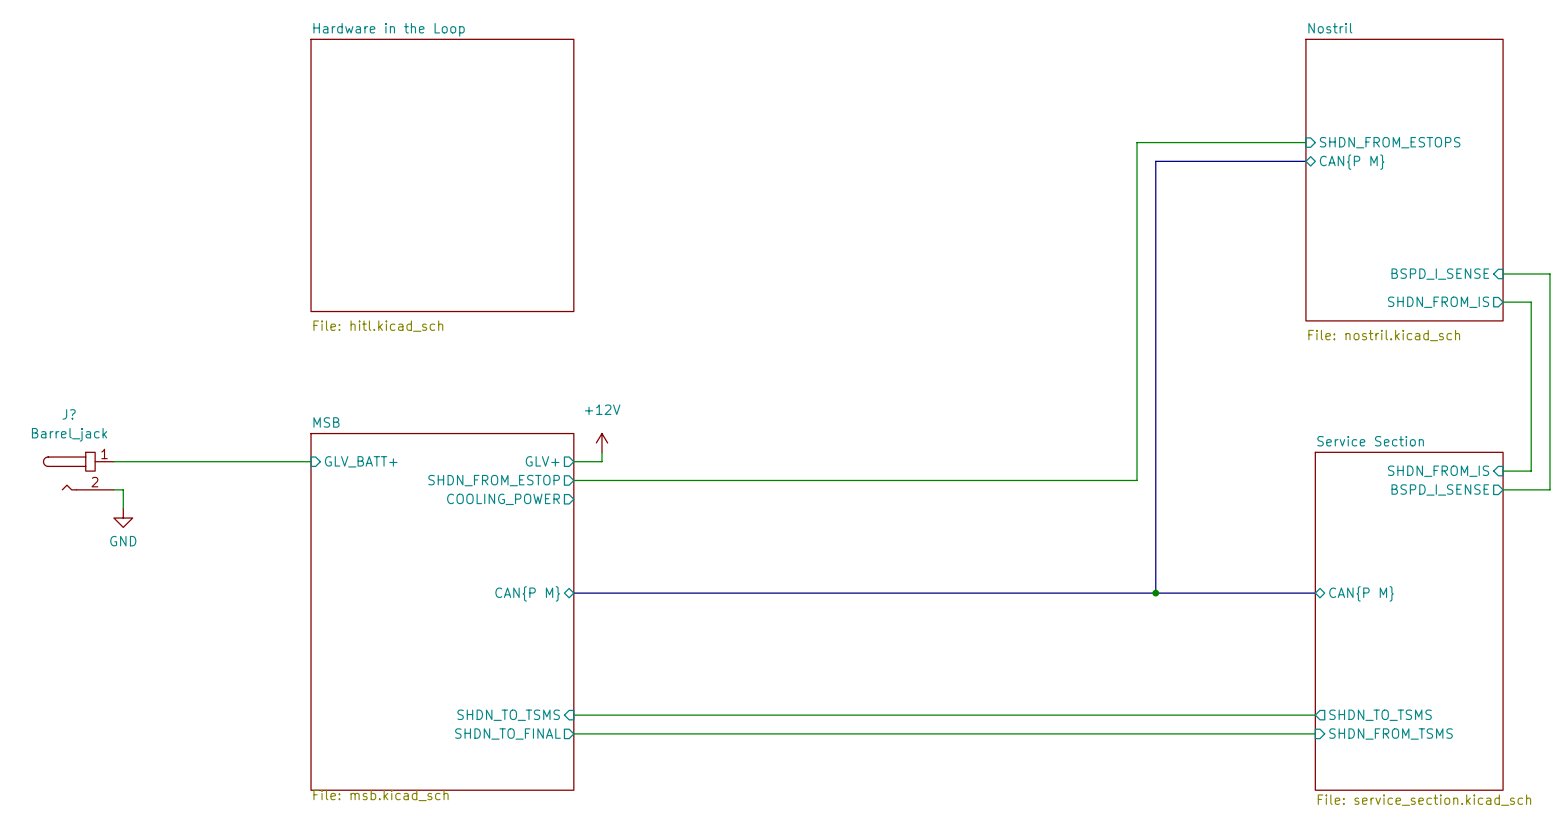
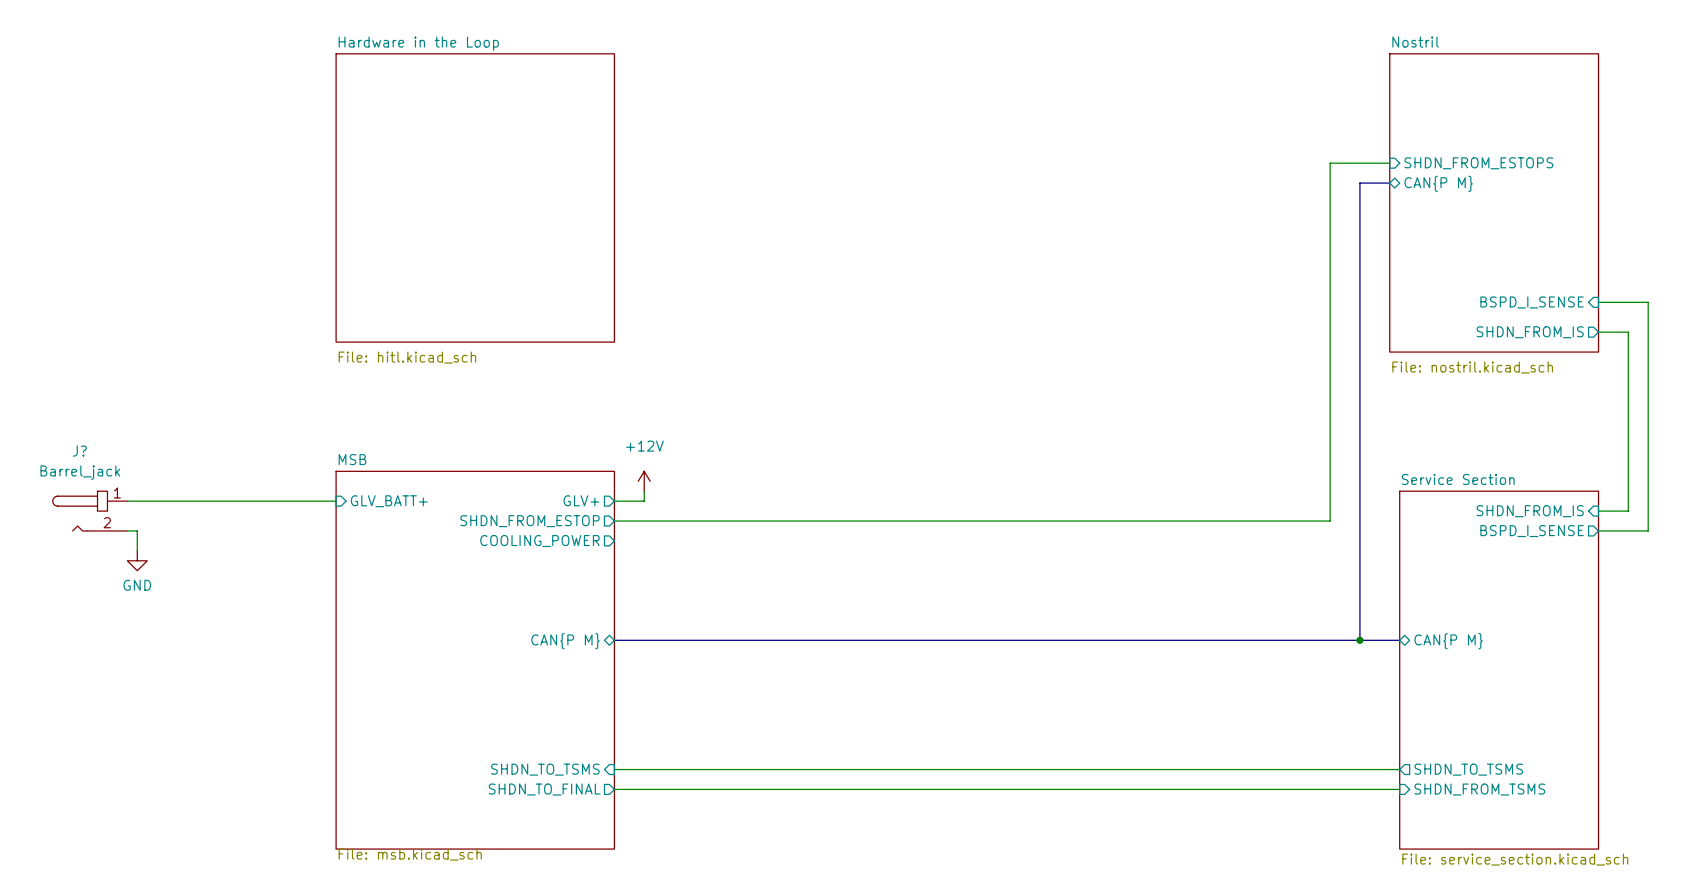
wire: (1249, 142) (1136, 142) (1136, 480) -> (1330, 163) (1330, 521) (1210, 521)
bus: (1277, 161) (1155, 161) (1155, 593) -> (1359, 183) (1359, 640)
junction: (1155, 593) -> none
junction: none -> (1359, 640)

